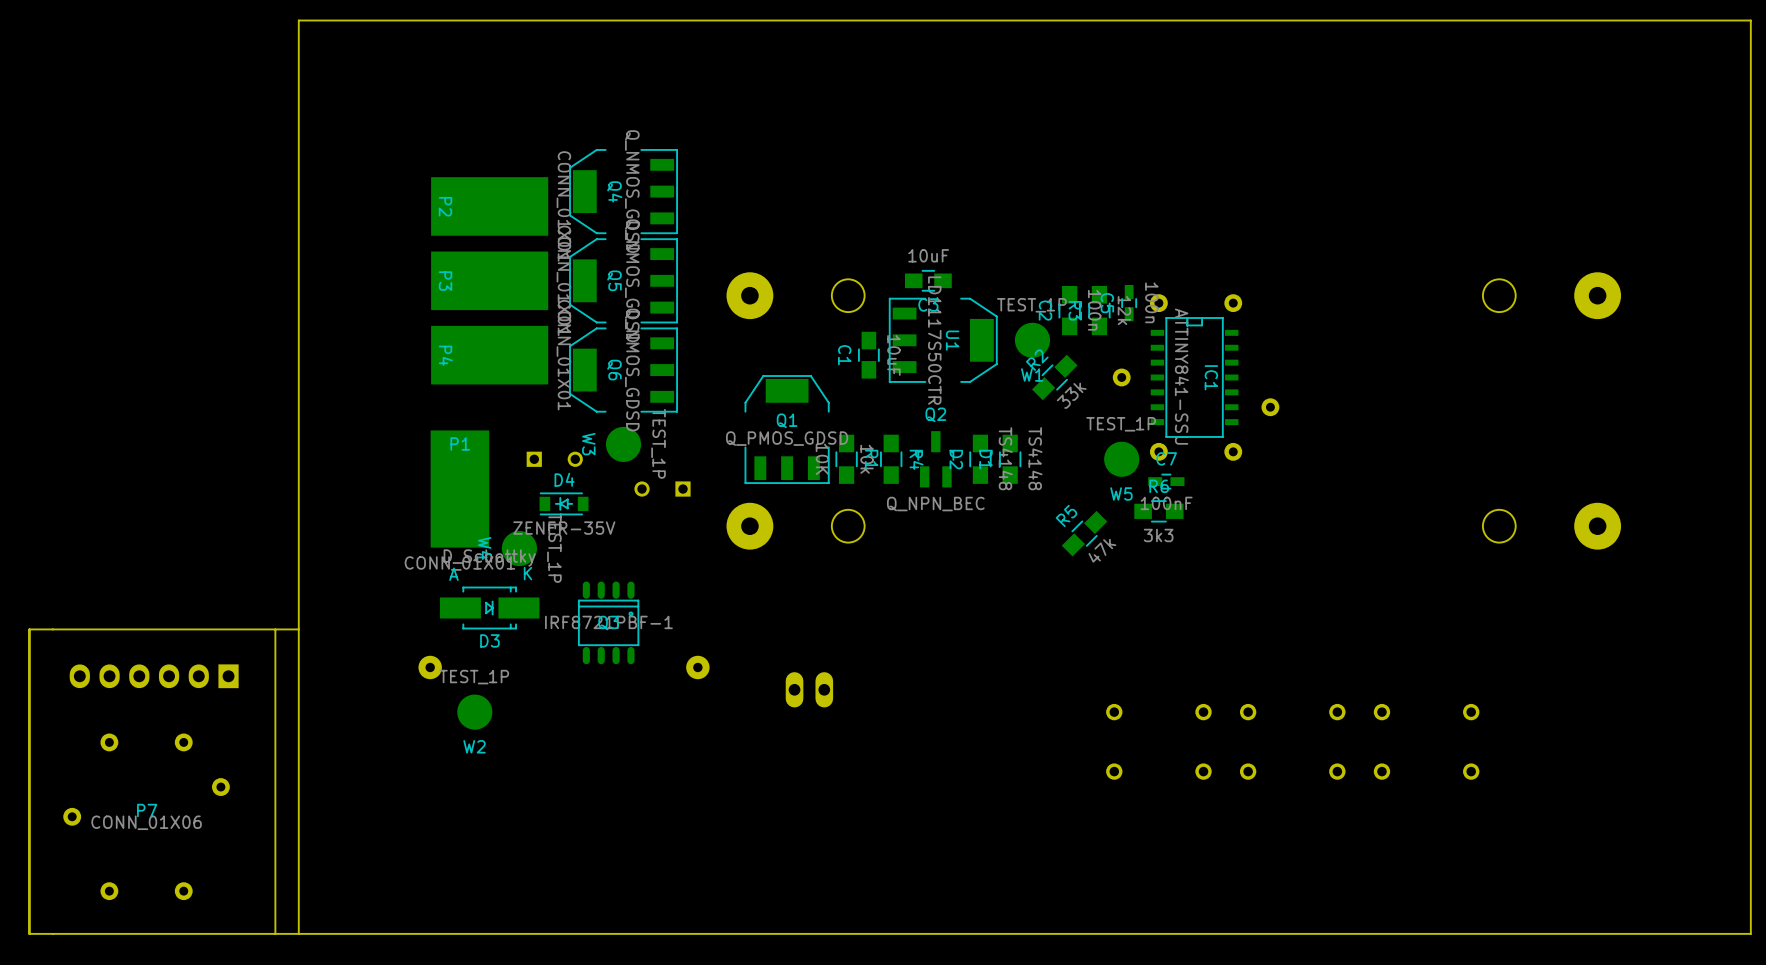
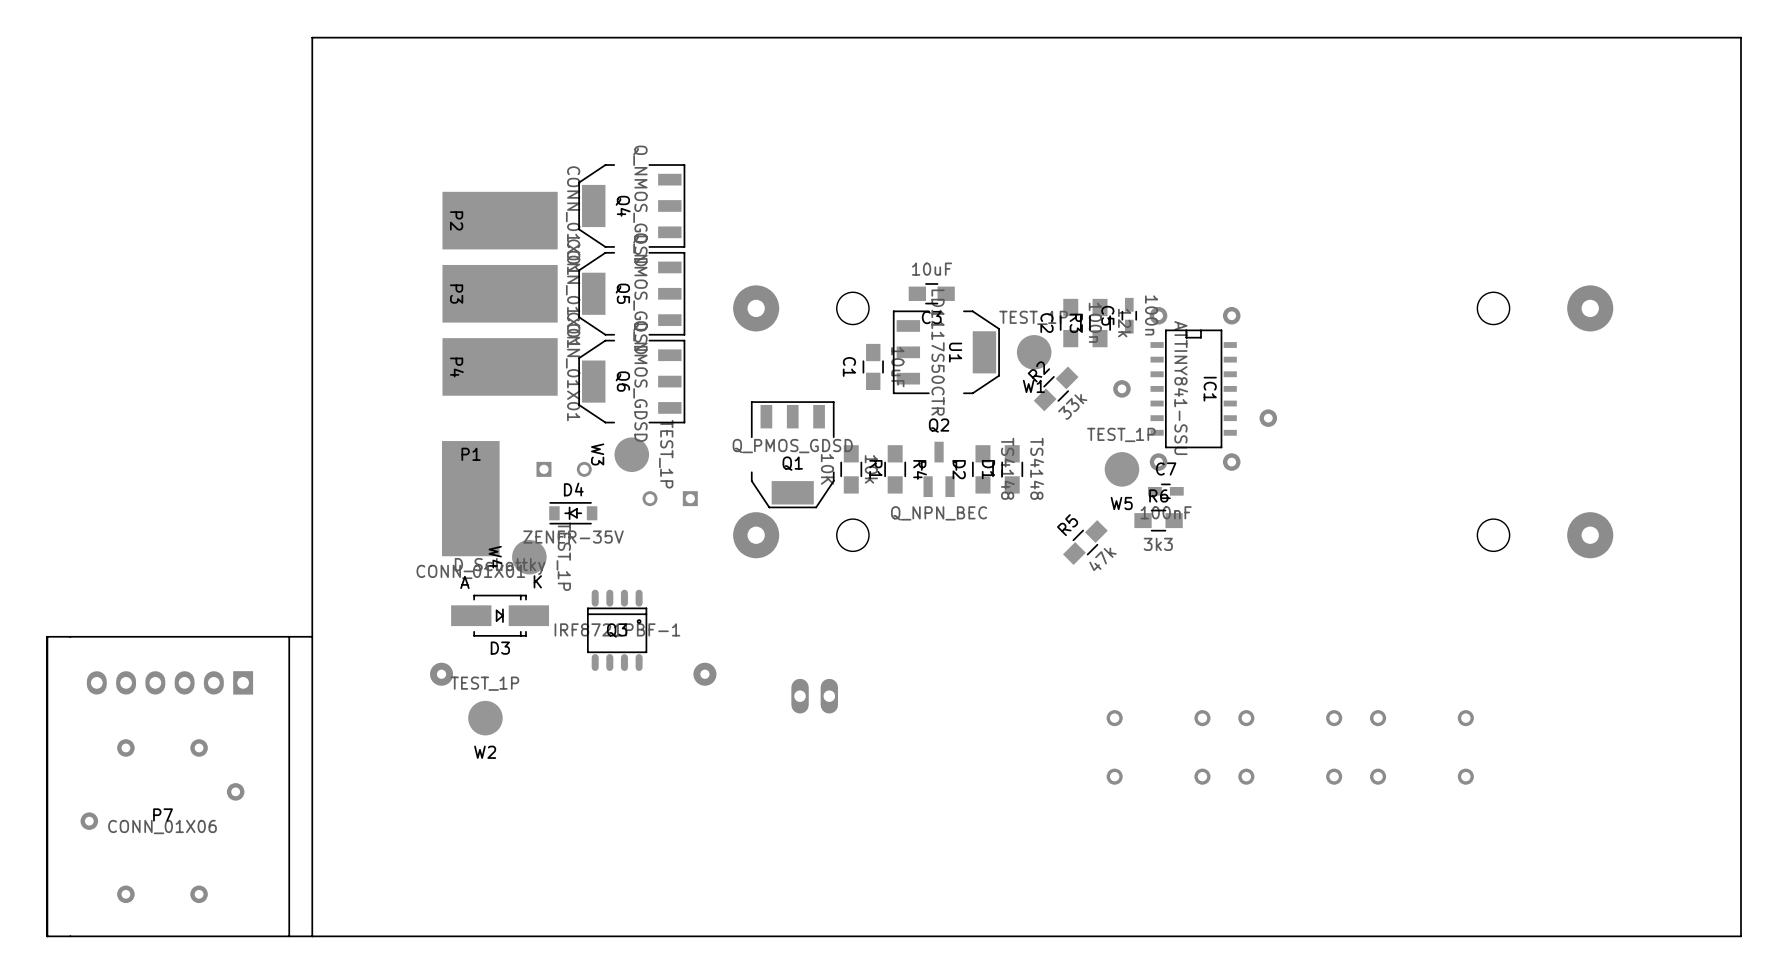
Q1 rotation: 0° (787, 429) -> 180° (792, 454)

